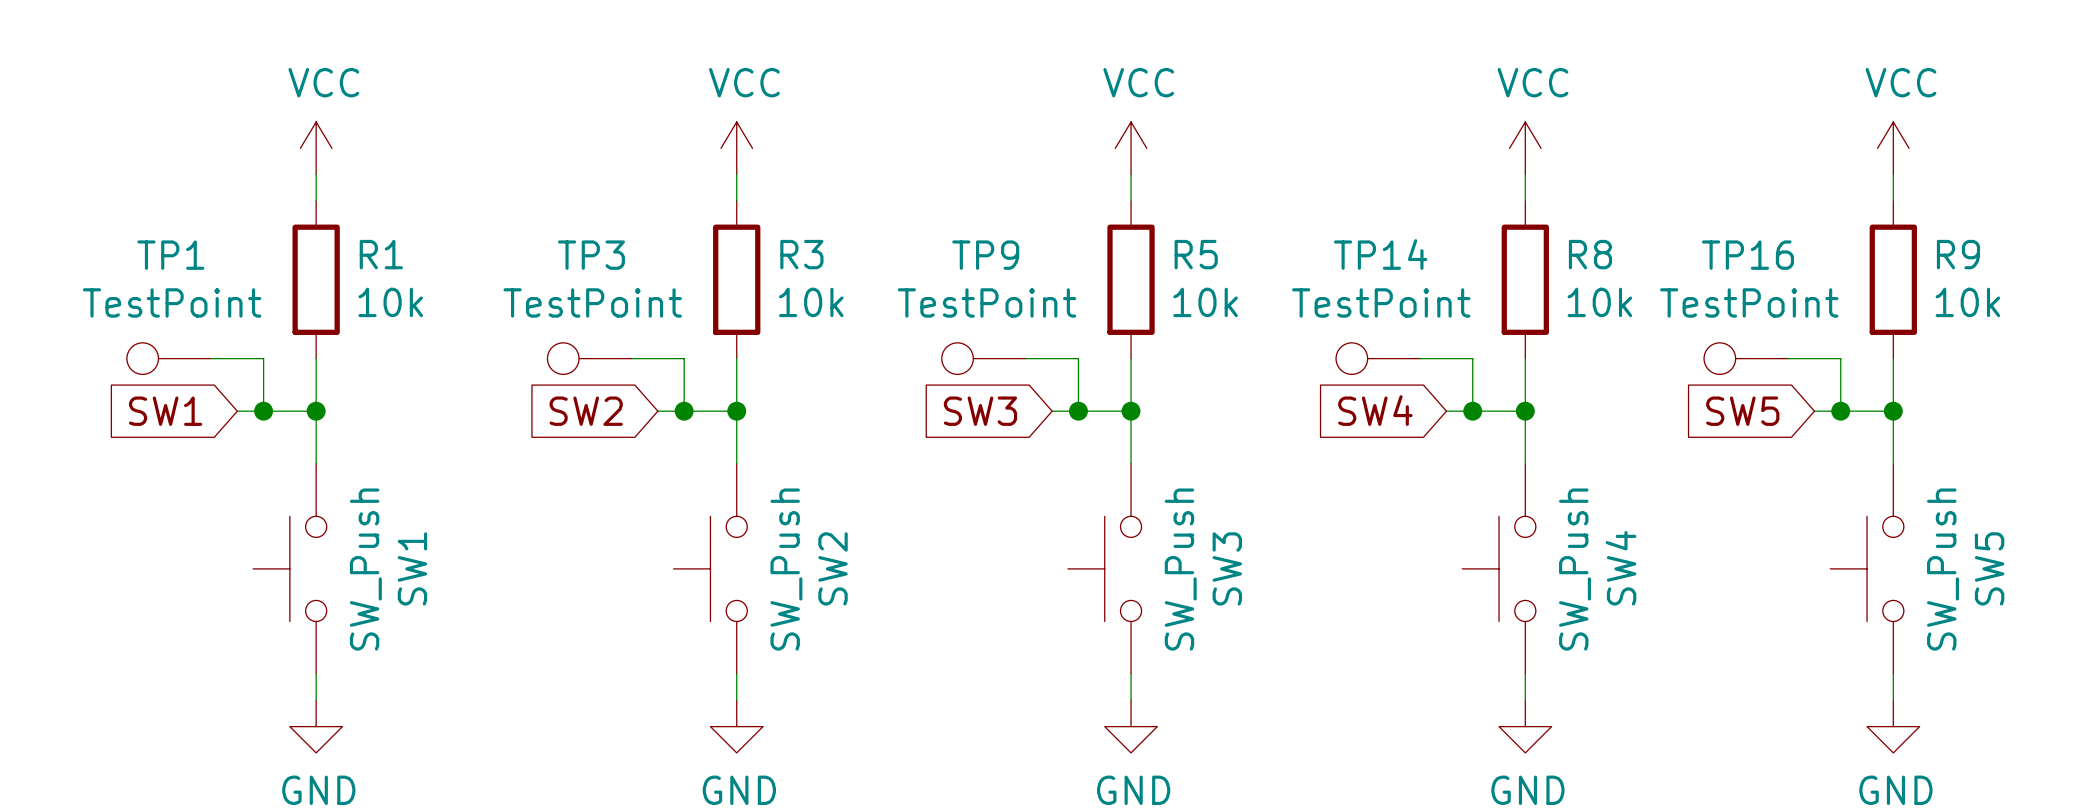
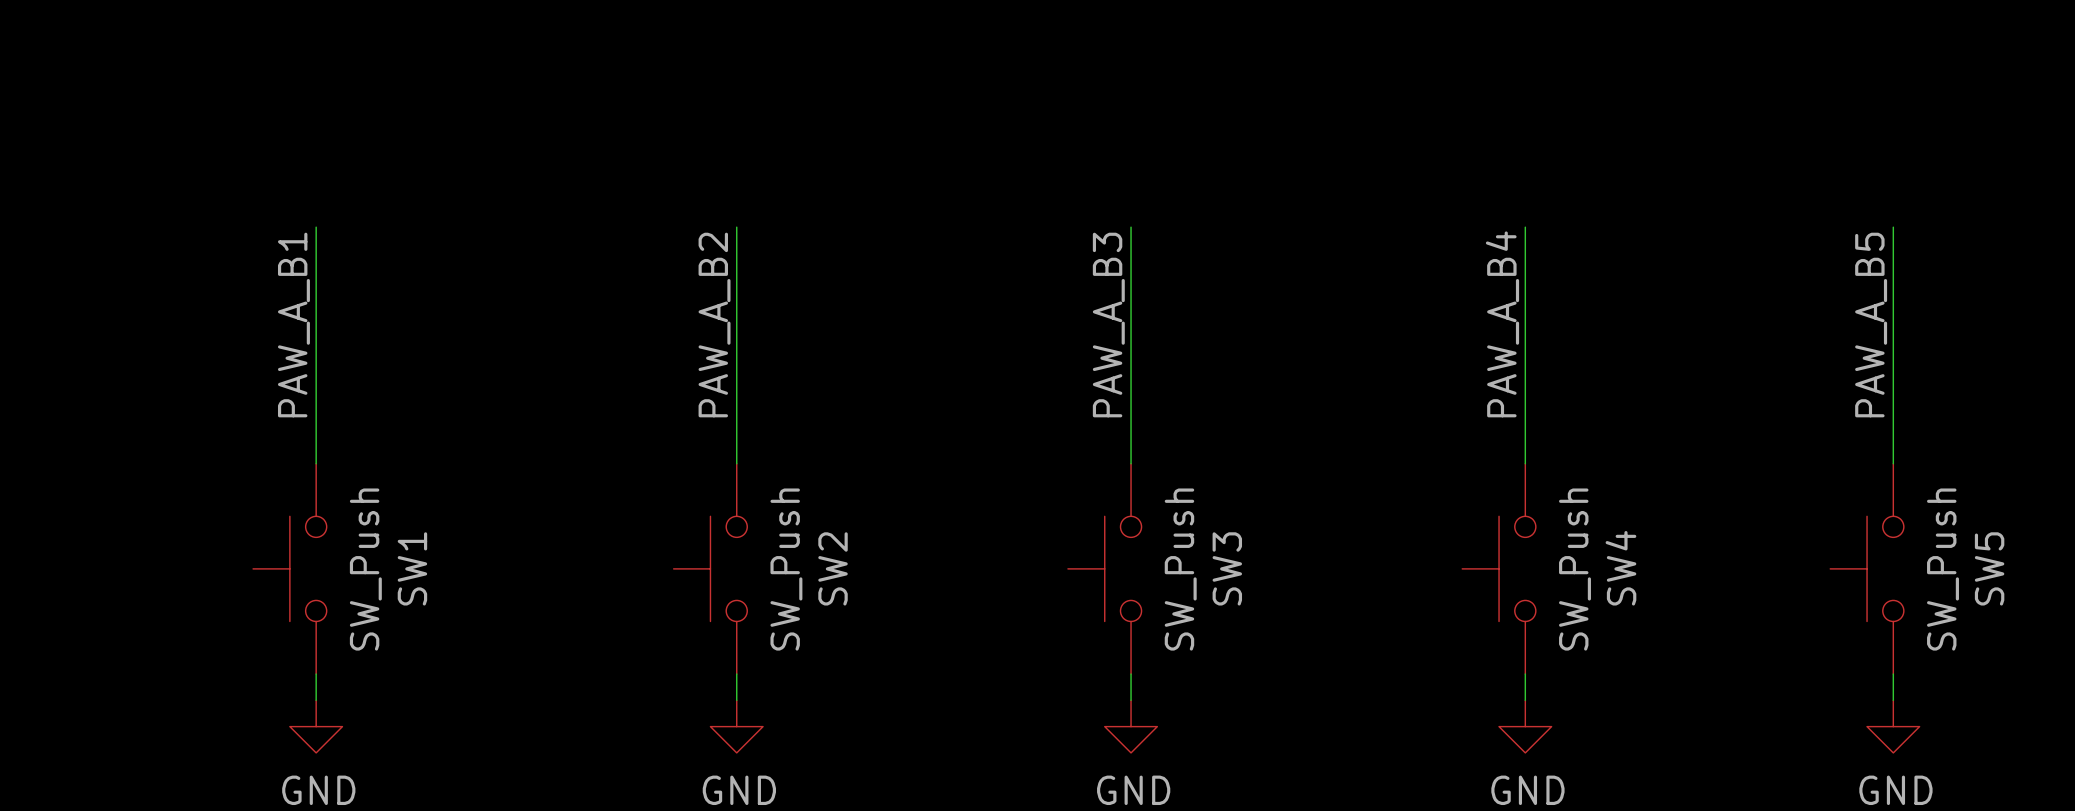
power symbol: VCC (316, 148) -> none
power symbol: VCC (736, 148) -> none
power symbol: VCC (1131, 148) -> none
power symbol: VCC (1525, 148) -> none
power symbol: VCC (1893, 148) -> none
wire: (316, 174) (316, 200) -> none
wire: (736, 174) (736, 200) -> none
wire: (1131, 174) (1131, 200) -> none
wire: (1525, 174) (1525, 200) -> none
wire: (1893, 174) (1893, 200) -> none
wire: none -> (316, 227) (316, 358)
wire: none -> (736, 227) (736, 358)
wire: none -> (1131, 227) (1131, 358)
wire: none -> (1525, 227) (1525, 358)
wire: none -> (1893, 227) (1893, 358)
R1: 10k (316, 279) -> none
R3: 10k (736, 279) -> none
R5: 10k (1131, 279) -> none
R8: 10k (1525, 279) -> none
R9: 10k (1893, 279) -> none
label: none -> PAW_A_B4 (1502, 324)
label: none -> PAW_A_B1 (293, 325)
label: none -> PAW_A_B2 (714, 325)
label: none -> PAW_A_B3 (1108, 325)
label: none -> PAW_A_B5 (1871, 325)
TP1: TestPoint (168, 358) -> none
wire: (211, 358) (263, 358) (263, 411) -> none
TP3: TestPoint (589, 358) -> none
wire: (631, 358) (684, 358) (684, 411) -> none
TP9: TestPoint (983, 358) -> none
wire: (1025, 358) (1078, 358) (1078, 411) -> none
TP14: TestPoint (1378, 358) -> none
wire: (1420, 358) (1472, 358) (1472, 411) -> none
TP16: TestPoint (1746, 358) -> none
wire: (1788, 358) (1840, 358) (1840, 411) -> none
global label: SW4 (1375, 410) -> none
global label: SW1 (165, 411) -> none
wire: (237, 411) (316, 411) -> none
junction: (263, 411) -> none
junction: (316, 411) -> none
global label: SW2 (586, 411) -> none
wire: (657, 411) (736, 411) -> none
junction: (684, 411) -> none
junction: (736, 411) -> none
global label: SW3 (980, 411) -> none
wire: (1052, 411) (1131, 411) -> none
junction: (1078, 411) -> none
junction: (1131, 411) -> none
wire: (1446, 411) (1525, 411) -> none
junction: (1472, 411) -> none
junction: (1525, 411) -> none
global label: SW5 (1742, 411) -> none
wire: (1814, 411) (1893, 411) -> none
junction: (1840, 411) -> none
junction: (1893, 411) -> none

